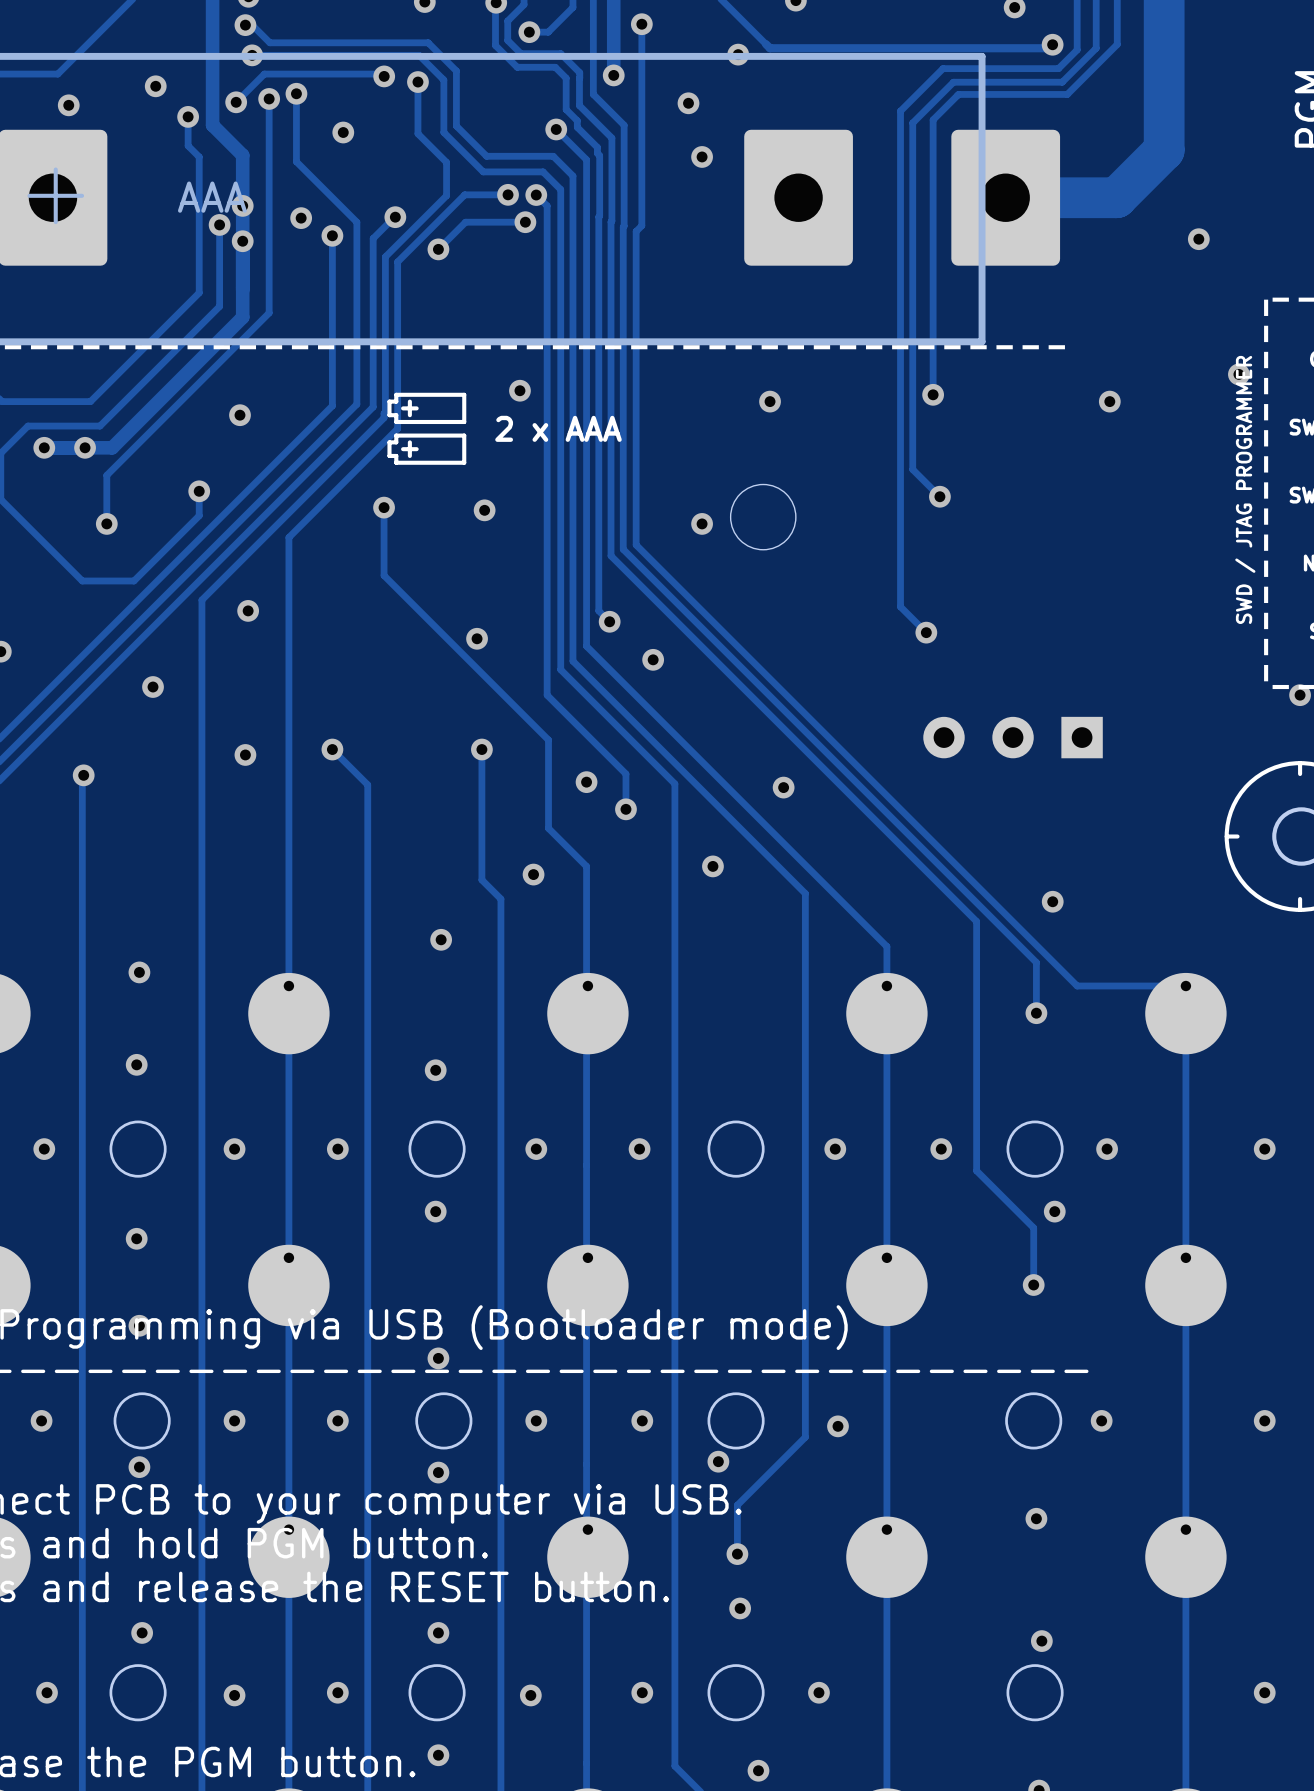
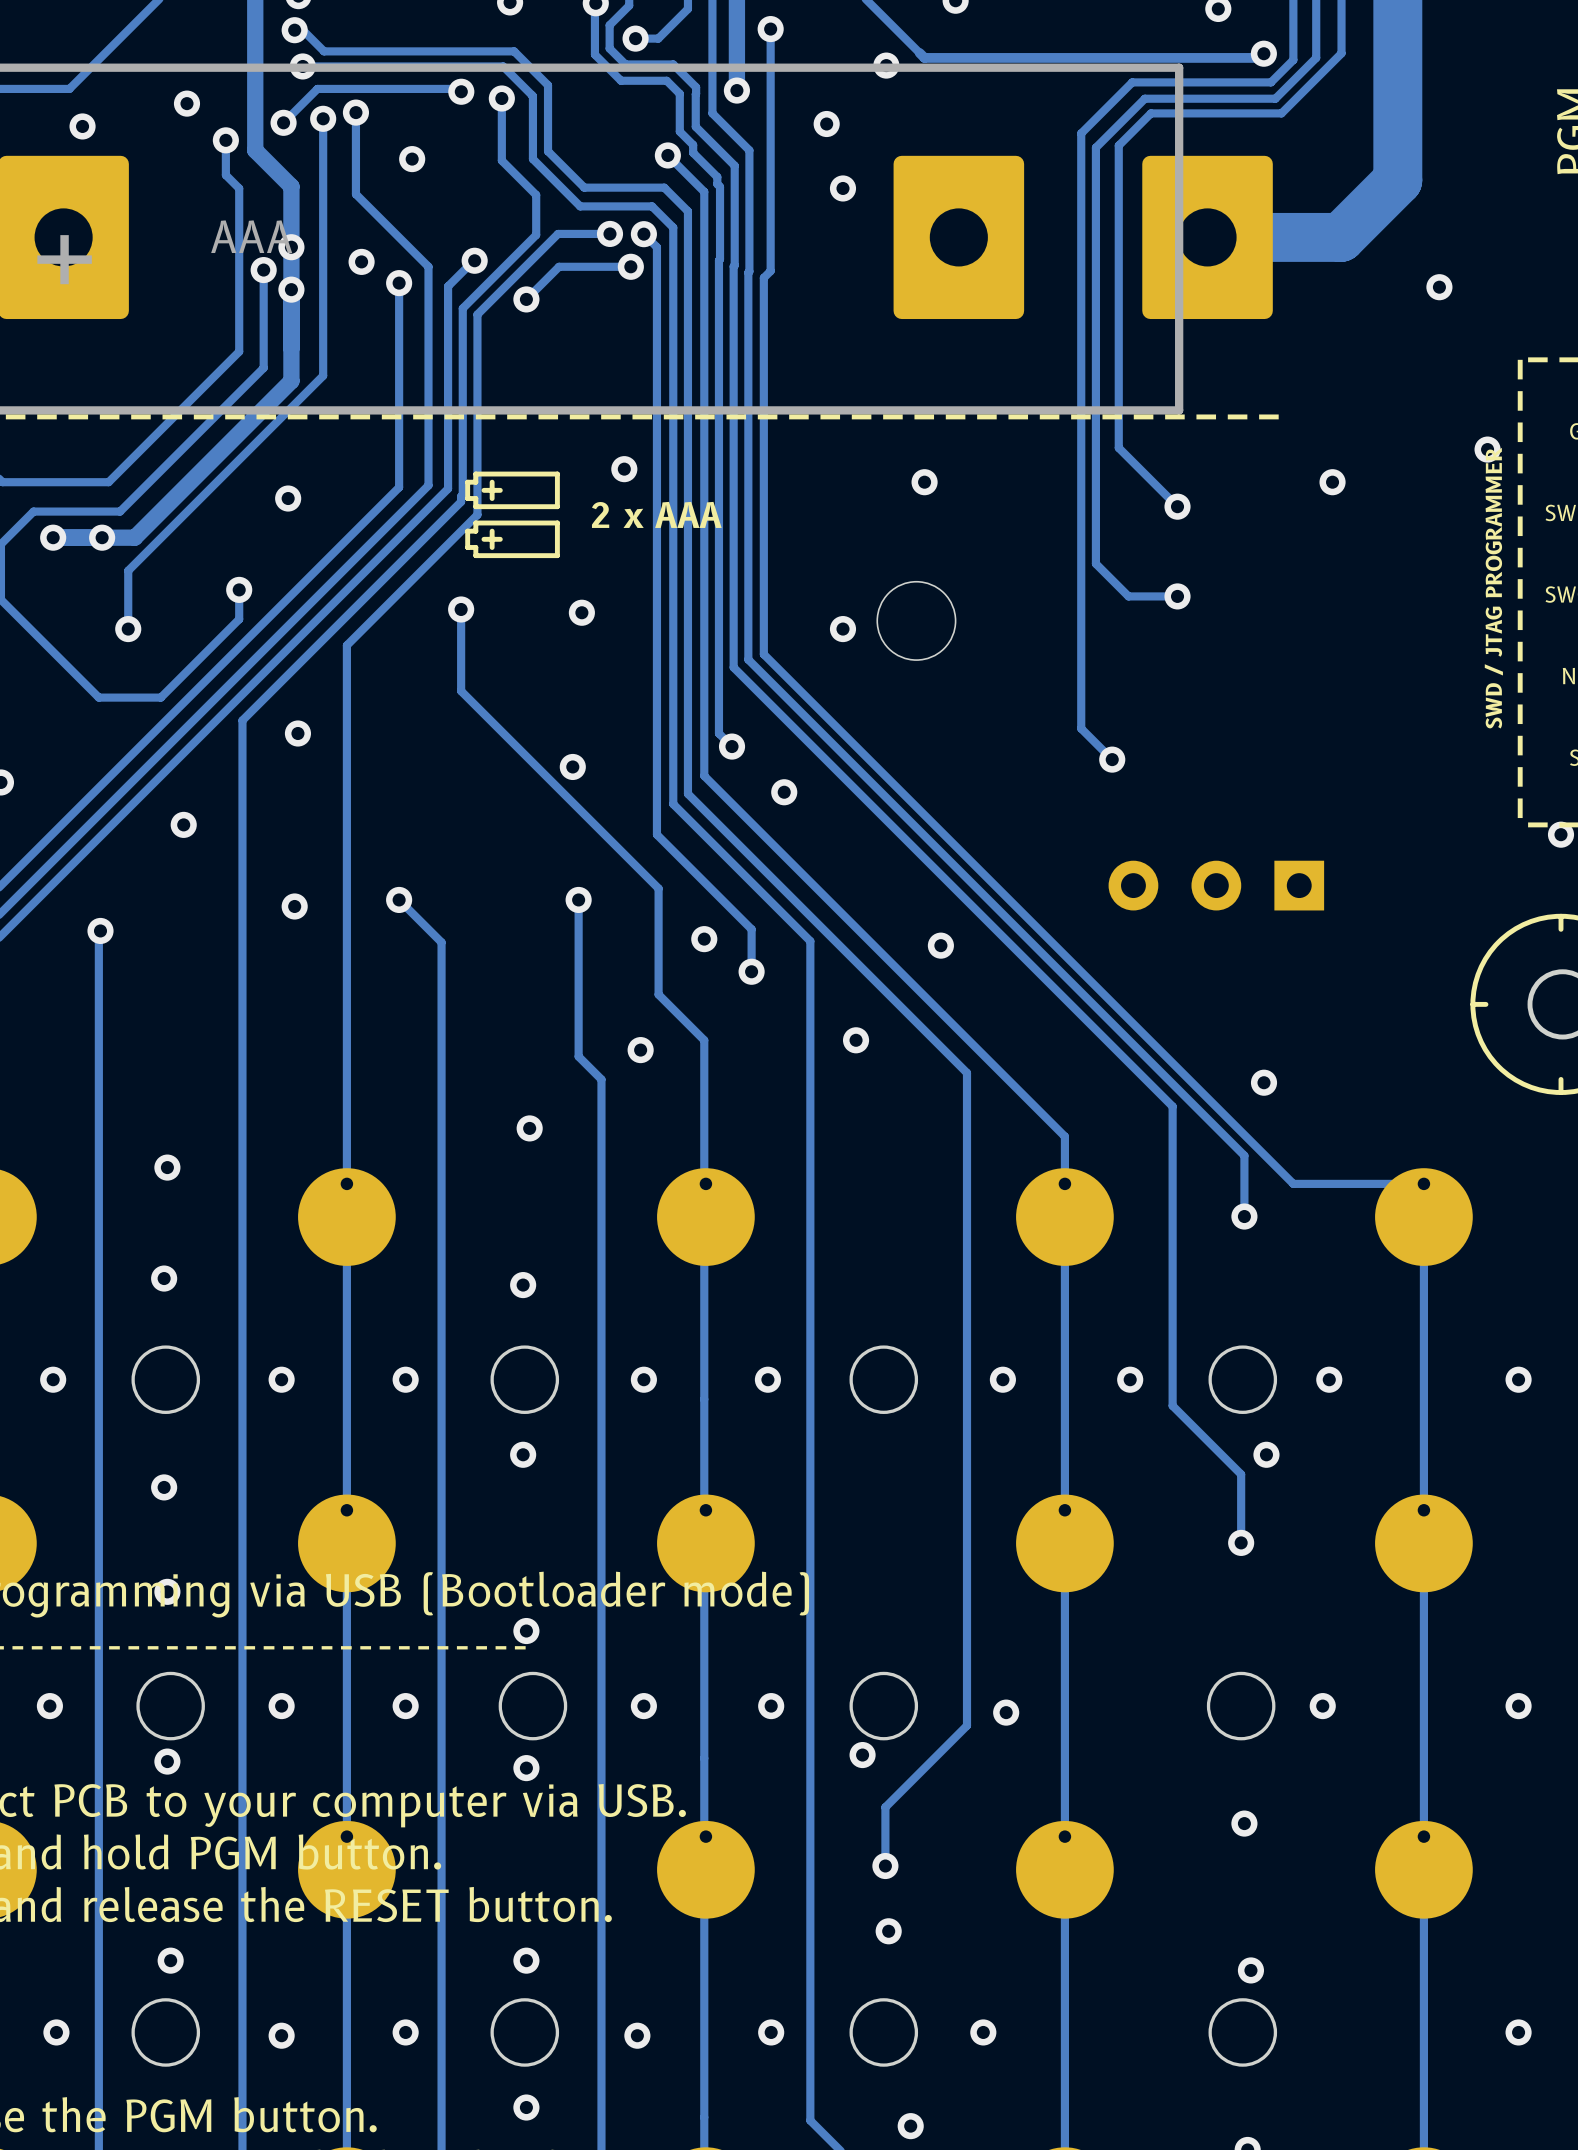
track: (933, 119) (933, 394) -> (1120, 143) (1118, 145) (1118, 447) (1177, 506)
via: (933, 394) -> none
via: none -> (1177, 506)
via position: (939, 496) -> (1177, 596)
track: none -> (1177, 596) (1128, 596)

